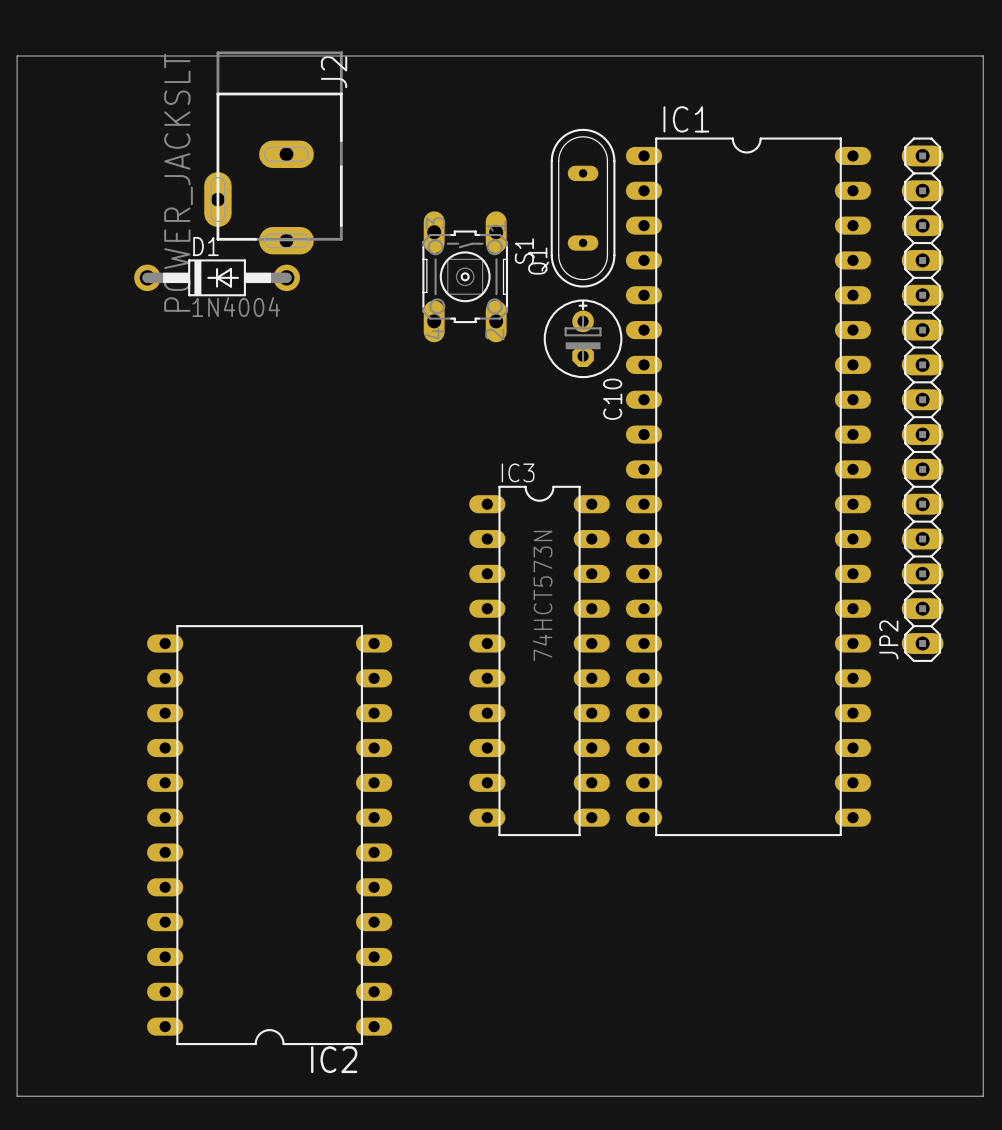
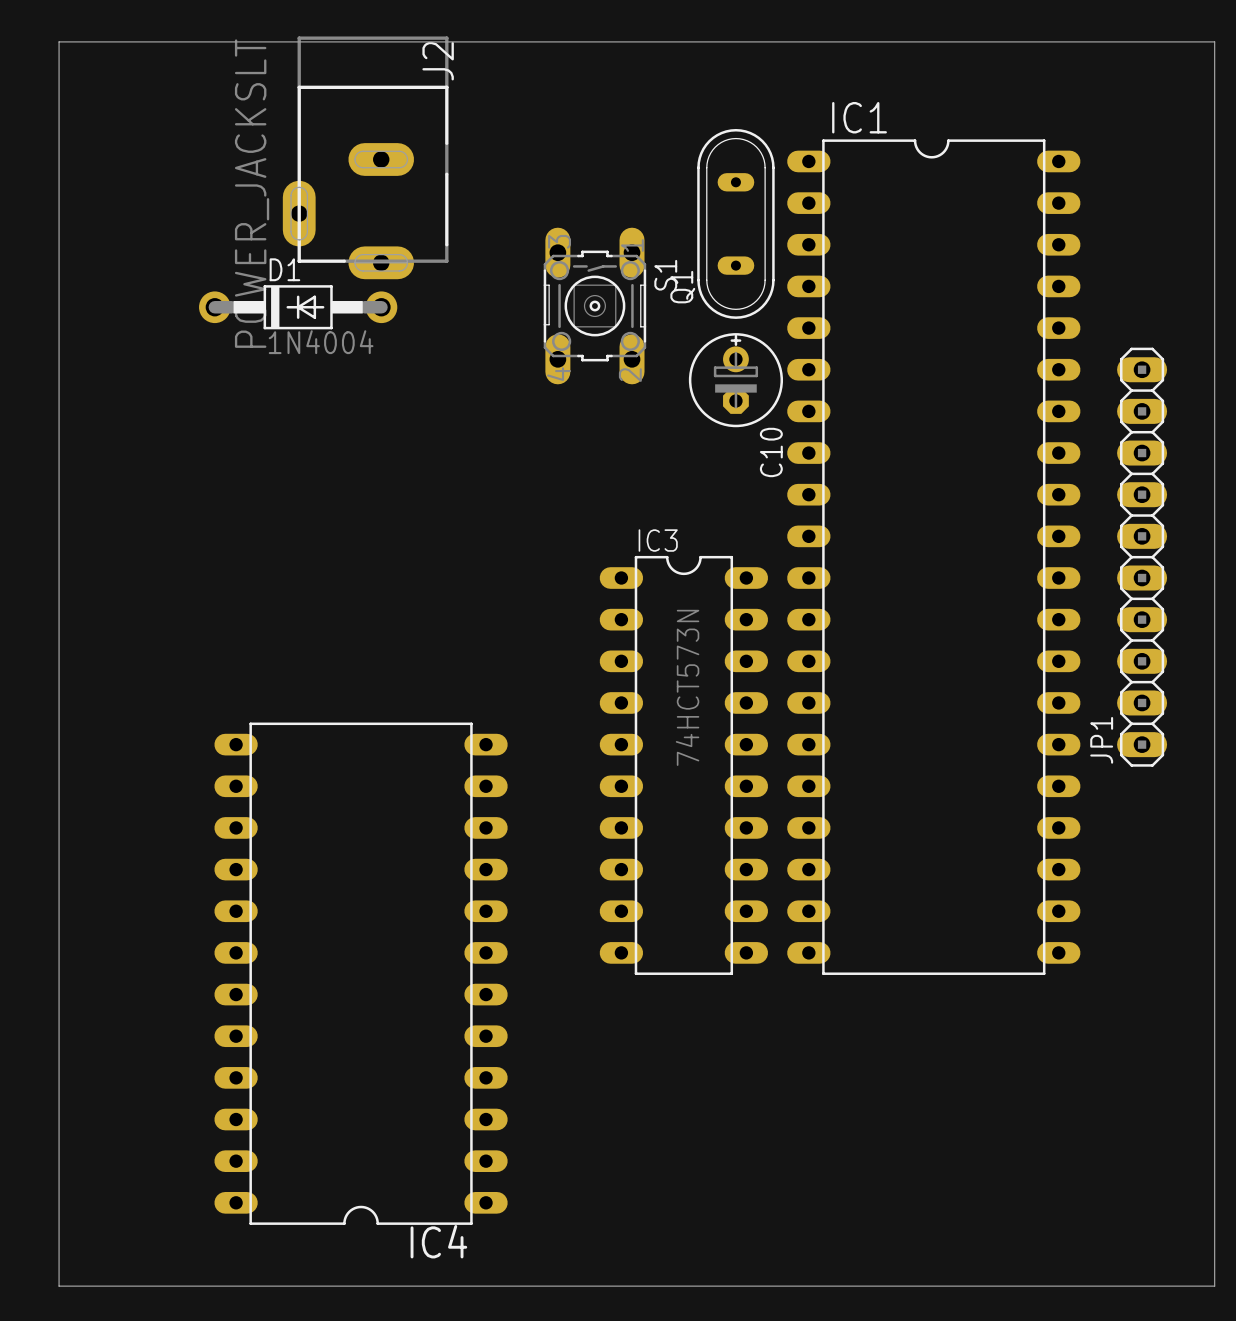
JP2: (922, 399) -> none
JP1: none -> (1142, 557)
IC2 name: IC2 (334, 1059) -> IC4 (438, 1241)

